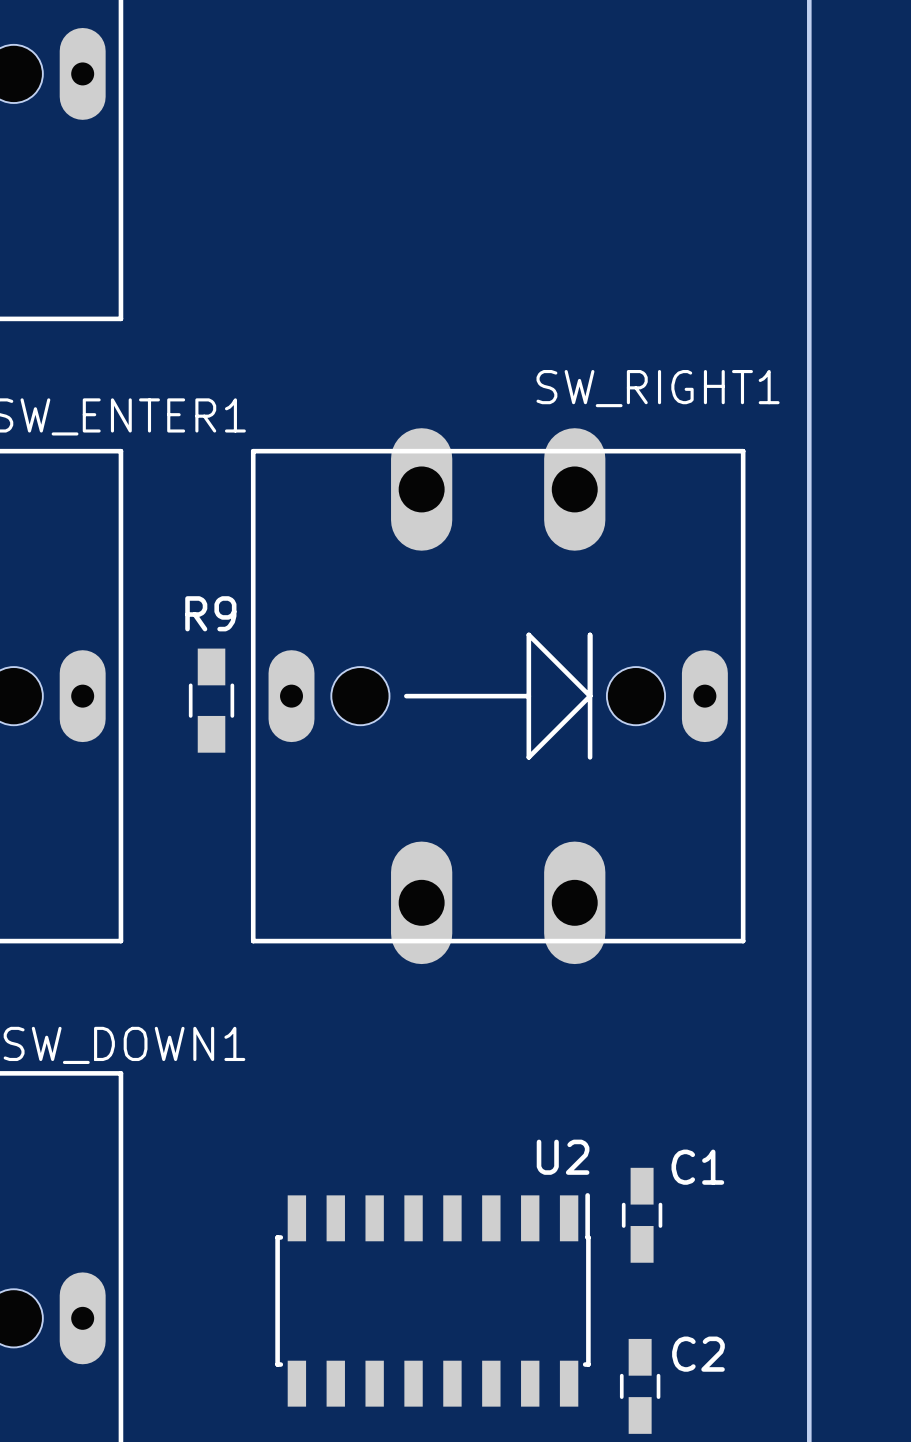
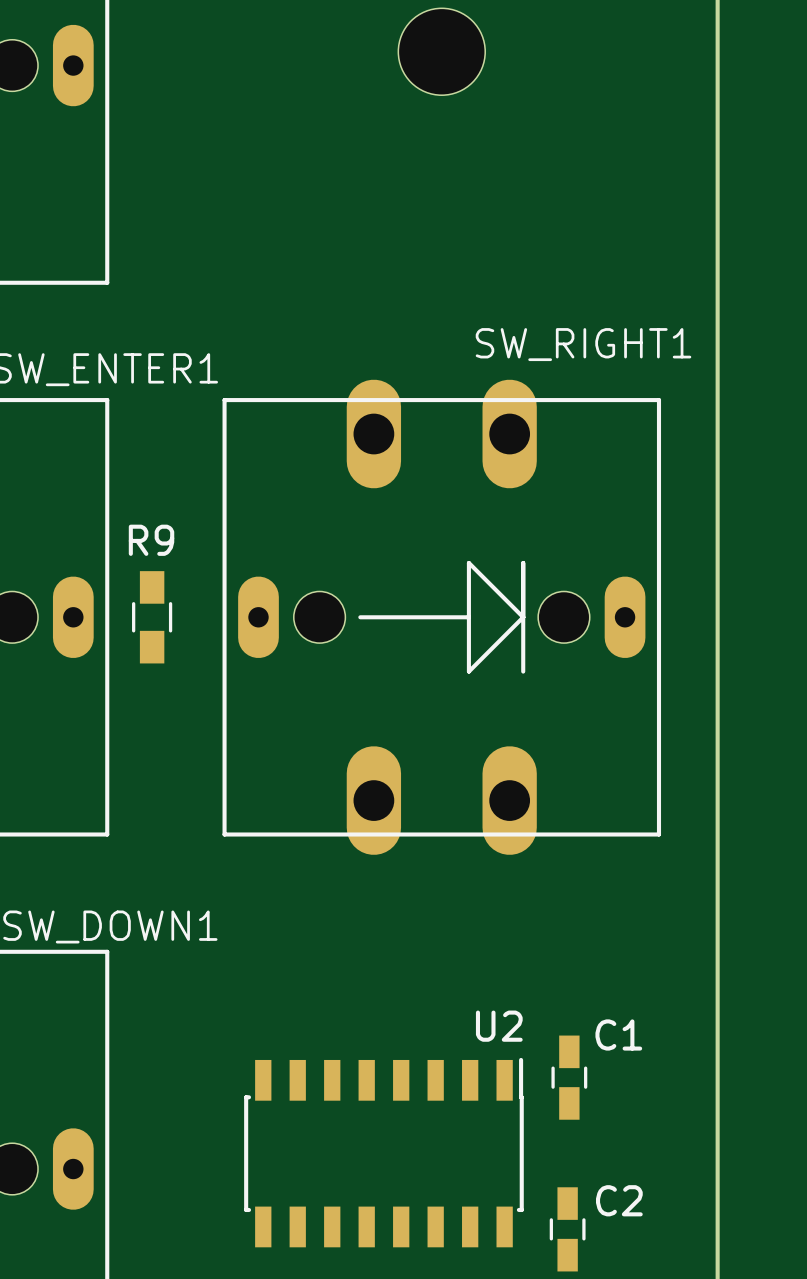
part: none -> (441, 51)
R9 position: (211, 700) -> (152, 617)

